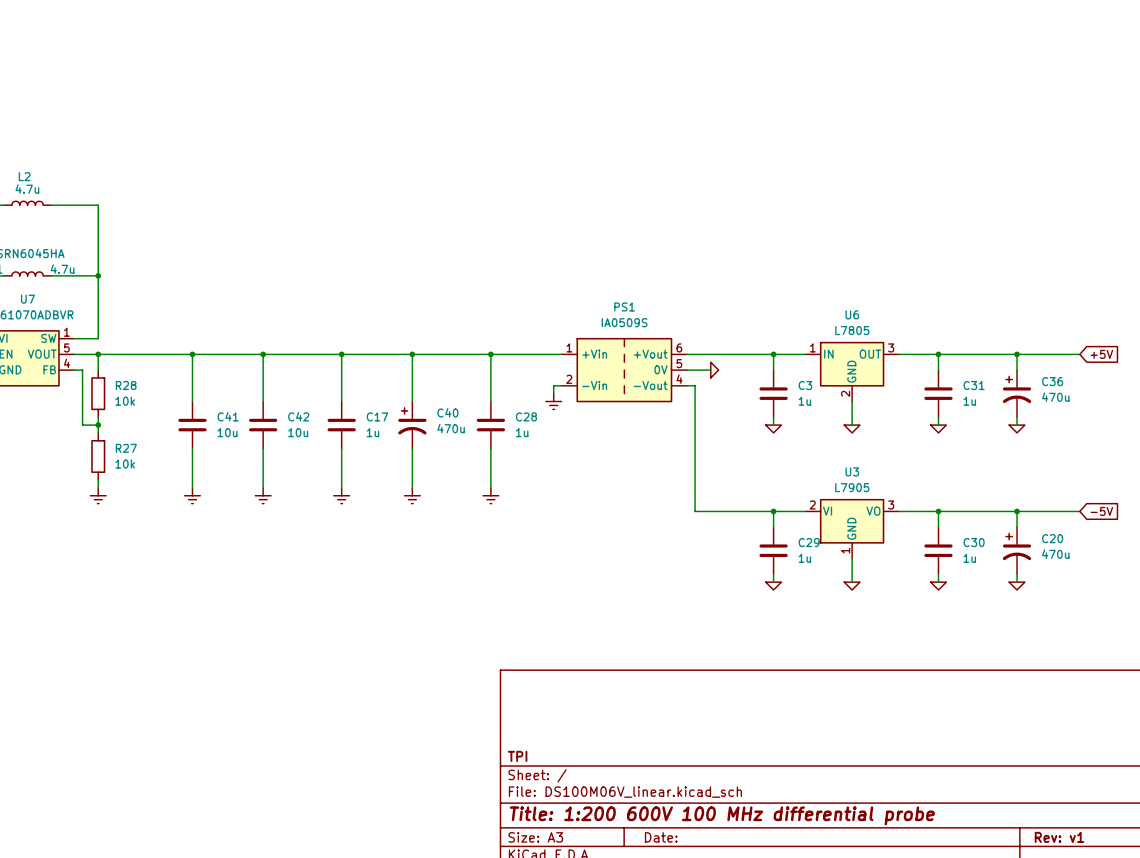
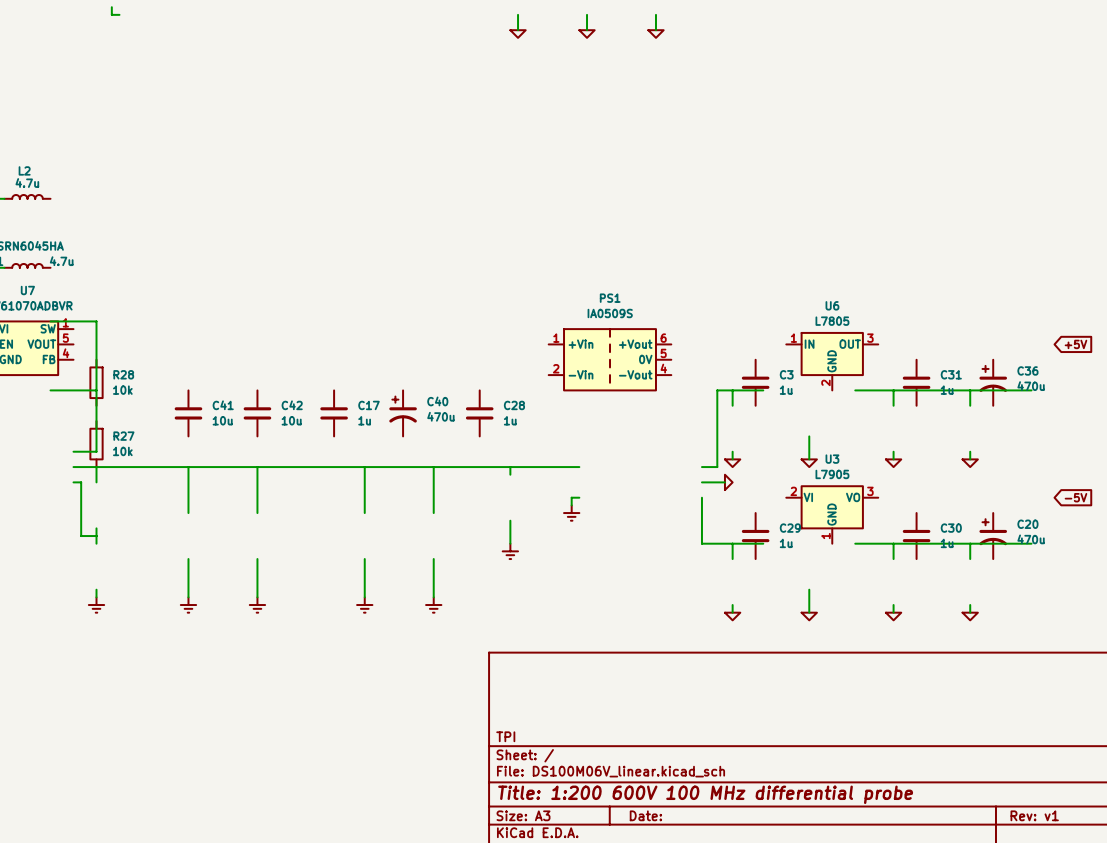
wire: none -> (111, 7) (111, 14) (119, 14)
wire: none -> (518, 14) (518, 30)
wire: none -> (587, 14) (587, 30)
wire: none -> (655, 14) (655, 30)
power symbol: none -> (518, 34)
power symbol: none -> (587, 34)
power symbol: none -> (655, 34)
wire: (51, 205) (98, 205) (98, 330) -> (50, 321) (96, 321)
wire: (51, 275) (98, 275) -> (50, 390) (96, 390)
junction: (98, 275) -> none
wire: (74, 338) (98, 338) -> (96, 344) (96, 329)
wire: (74, 354) (561, 354) -> none
junction: (98, 354) -> none
wire: (192, 354) (192, 401) -> (96, 359) (96, 405)
junction: (192, 354) -> none
wire: (263, 354) (263, 401) -> none
junction: (263, 354) -> none
wire: (341, 354) (341, 401) -> (364, 467) (364, 513)
junction: (341, 354) -> none
wire: (412, 354) (412, 401) -> (433, 467) (433, 513)
junction: (412, 354) -> none
wire: (490, 354) (490, 401) -> none
junction: (490, 354) -> none
wire: (687, 354) (804, 354) -> none
wire: (773, 354) (773, 370) -> (732, 390) (732, 405)
junction: (773, 354) -> none
wire: (899, 354) (1079, 354) -> (855, 390) (1031, 390)
wire: (938, 354) (938, 370) -> (893, 390) (893, 405)
junction: (938, 354) -> none
wire: (1017, 354) (1017, 370) -> (970, 390) (970, 405)
junction: (1017, 354) -> none
wire: (74, 370) (82, 370) (82, 425) (98, 425) -> (73, 482) (81, 482) (81, 536) (96, 536)
wire: (687, 370) (710, 370) -> (701, 482) (724, 482)
power symbol: (714, 370) -> none
wire: (561, 385) (553, 385) (553, 393) -> (579, 497) (571, 497) (571, 505)
wire: (687, 385) (695, 385) (695, 511) (804, 511) -> none
power symbol: (553, 401) -> none
wire: none -> (763, 390) (717, 390) (717, 467) (701, 467)
wire: (852, 401) (852, 425) -> (809, 436) (809, 459)
wire: (773, 417) (773, 425) -> (732, 451) (732, 459)
wire: (938, 417) (938, 425) -> (893, 451) (893, 459)
wire: (1017, 417) (1017, 425) -> (970, 451) (970, 459)
junction: (98, 425) -> none
power symbol: (773, 429) -> none
power symbol: (852, 429) -> none
power symbol: (938, 429) -> none
power symbol: (1017, 429) -> none
wire: none -> (96, 421) (96, 451) (73, 451)
wire: (192, 448) (192, 480) -> none
wire: (263, 448) (263, 480) -> none
wire: (341, 448) (341, 487) -> (364, 559) (364, 597)
wire: (412, 448) (412, 487) -> (433, 559) (433, 597)
wire: (490, 448) (490, 487) -> none
power symbol: none -> (732, 463)
power symbol: none -> (809, 463)
power symbol: none -> (893, 463)
power symbol: none -> (970, 463)
wire: none -> (73, 467) (579, 467)
wire: none -> (510, 467) (510, 474)
wire: none -> (188, 474) (188, 513)
wire: none -> (257, 474) (257, 513)
power symbol: (98, 495) -> none
power symbol: (192, 495) -> none
power symbol: (263, 495) -> none
power symbol: (341, 495) -> none
power symbol: (412, 495) -> none
power symbol: (490, 495) -> none
power symbol: none -> (728, 482)
wire: none -> (701, 497) (701, 543) (763, 543)
wire: (773, 511) (773, 527) -> (732, 543) (732, 559)
junction: (773, 511) -> none
wire: (899, 511) (1079, 511) -> (855, 543) (1031, 543)
wire: (938, 511) (938, 527) -> (893, 543) (893, 559)
junction: (938, 511) -> none
wire: (1017, 511) (1017, 527) -> (970, 543) (970, 559)
junction: (1017, 511) -> none
power symbol: none -> (571, 513)
wire: none -> (510, 520) (510, 543)
wire: none -> (96, 528) (96, 543)
wire: (852, 558) (852, 582) -> (809, 589) (809, 612)
power symbol: none -> (510, 551)
wire: none -> (188, 559) (188, 597)
wire: none -> (257, 559) (257, 597)
wire: (773, 574) (773, 582) -> (732, 605) (732, 612)
wire: (938, 574) (938, 582) -> (893, 605) (893, 612)
wire: (1017, 574) (1017, 582) -> (970, 605) (970, 612)
power symbol: (773, 586) -> none
power symbol: (852, 586) -> none
power symbol: (938, 586) -> none
power symbol: (1017, 586) -> none
wire: none -> (96, 589) (96, 597)
power symbol: none -> (96, 605)
power symbol: none -> (188, 605)
power symbol: none -> (257, 605)
power symbol: none -> (364, 605)
power symbol: none -> (433, 605)
power symbol: none -> (732, 616)
power symbol: none -> (809, 616)
power symbol: none -> (893, 616)
power symbol: none -> (970, 616)

